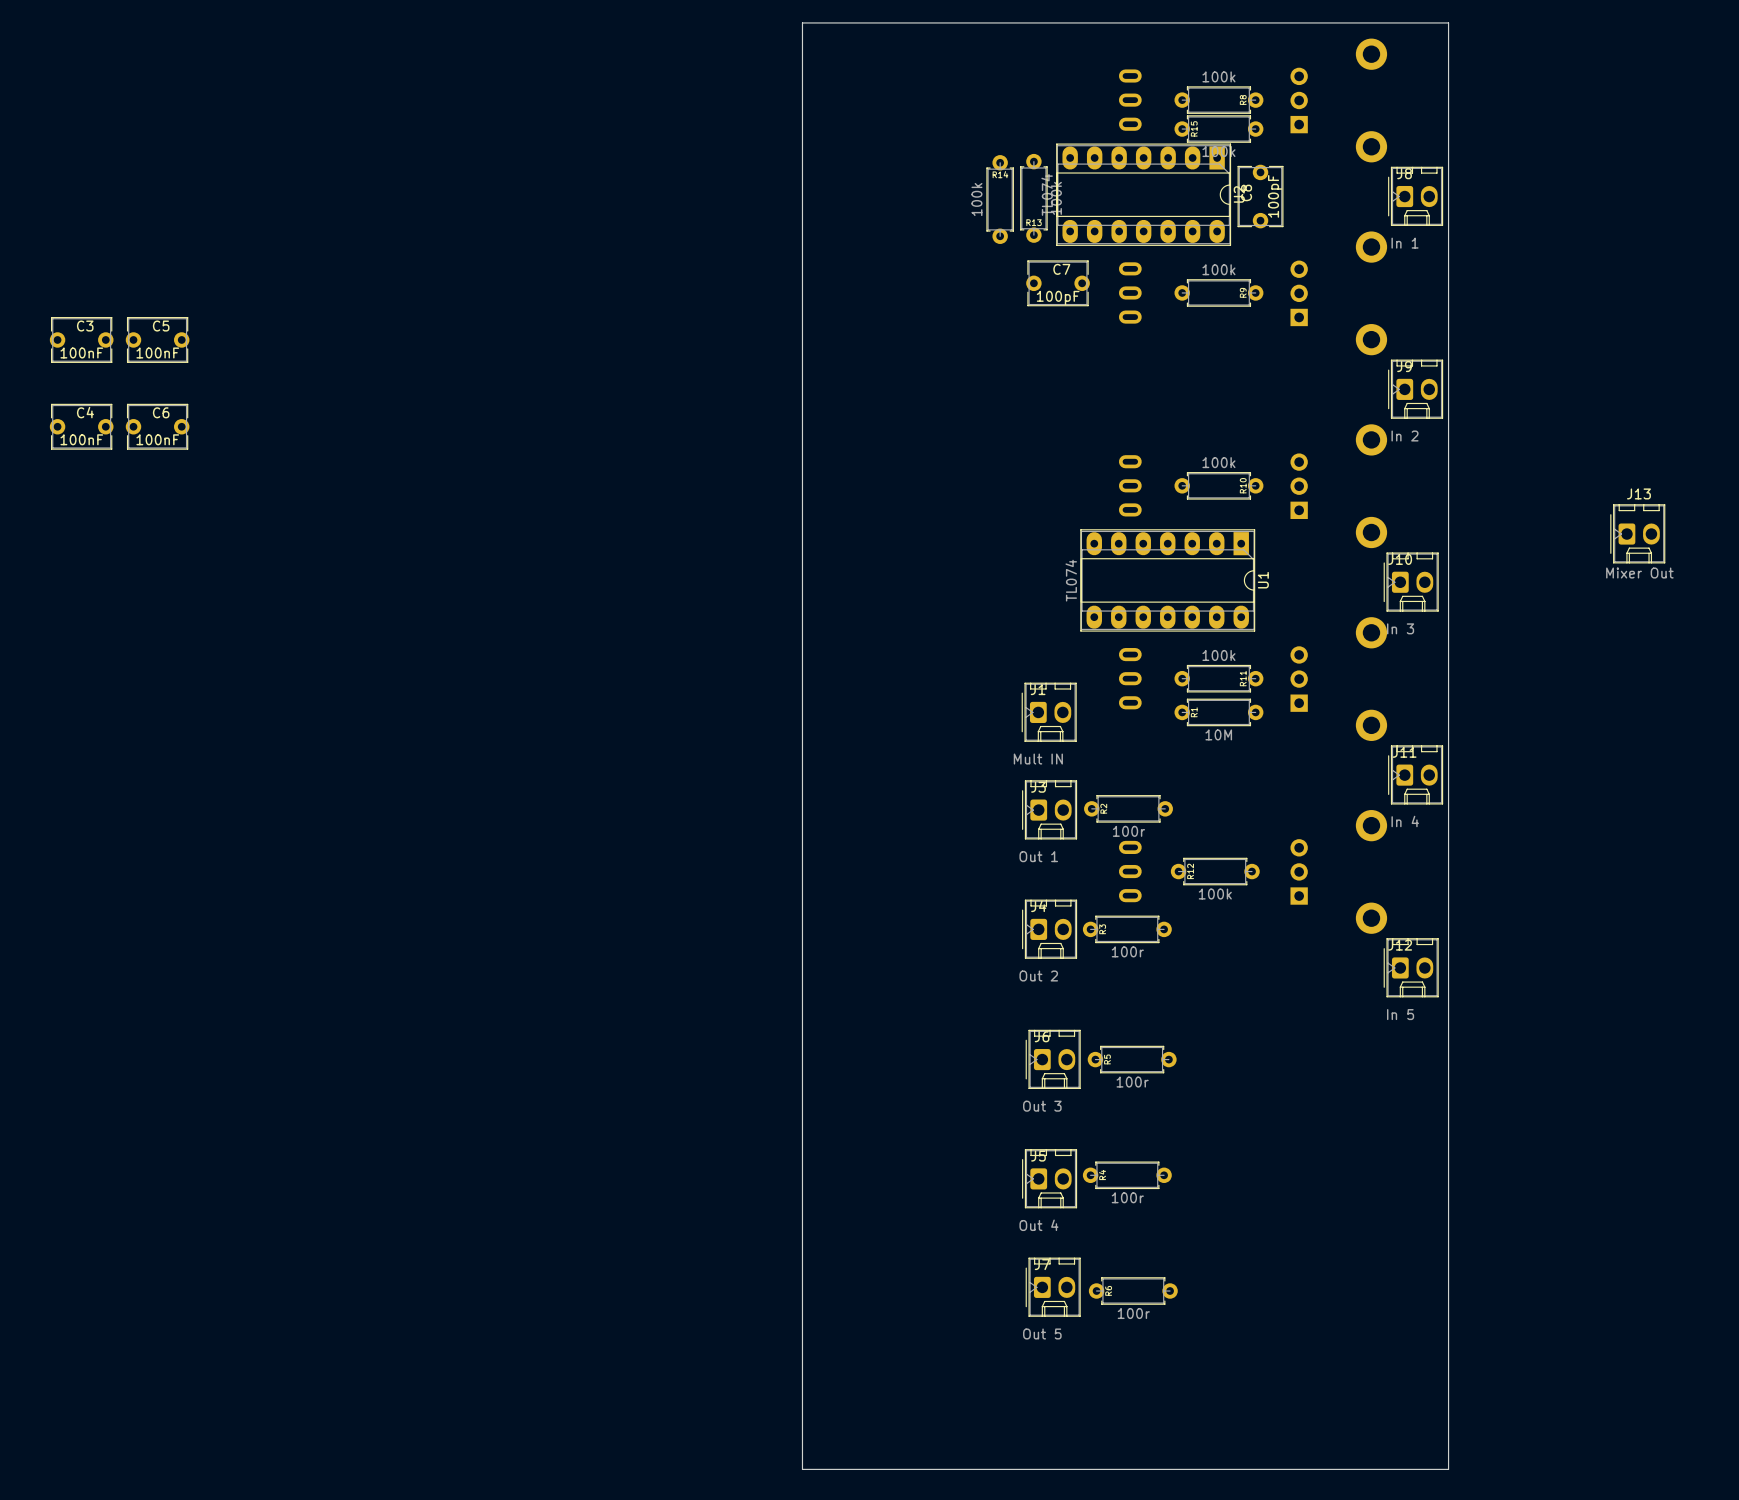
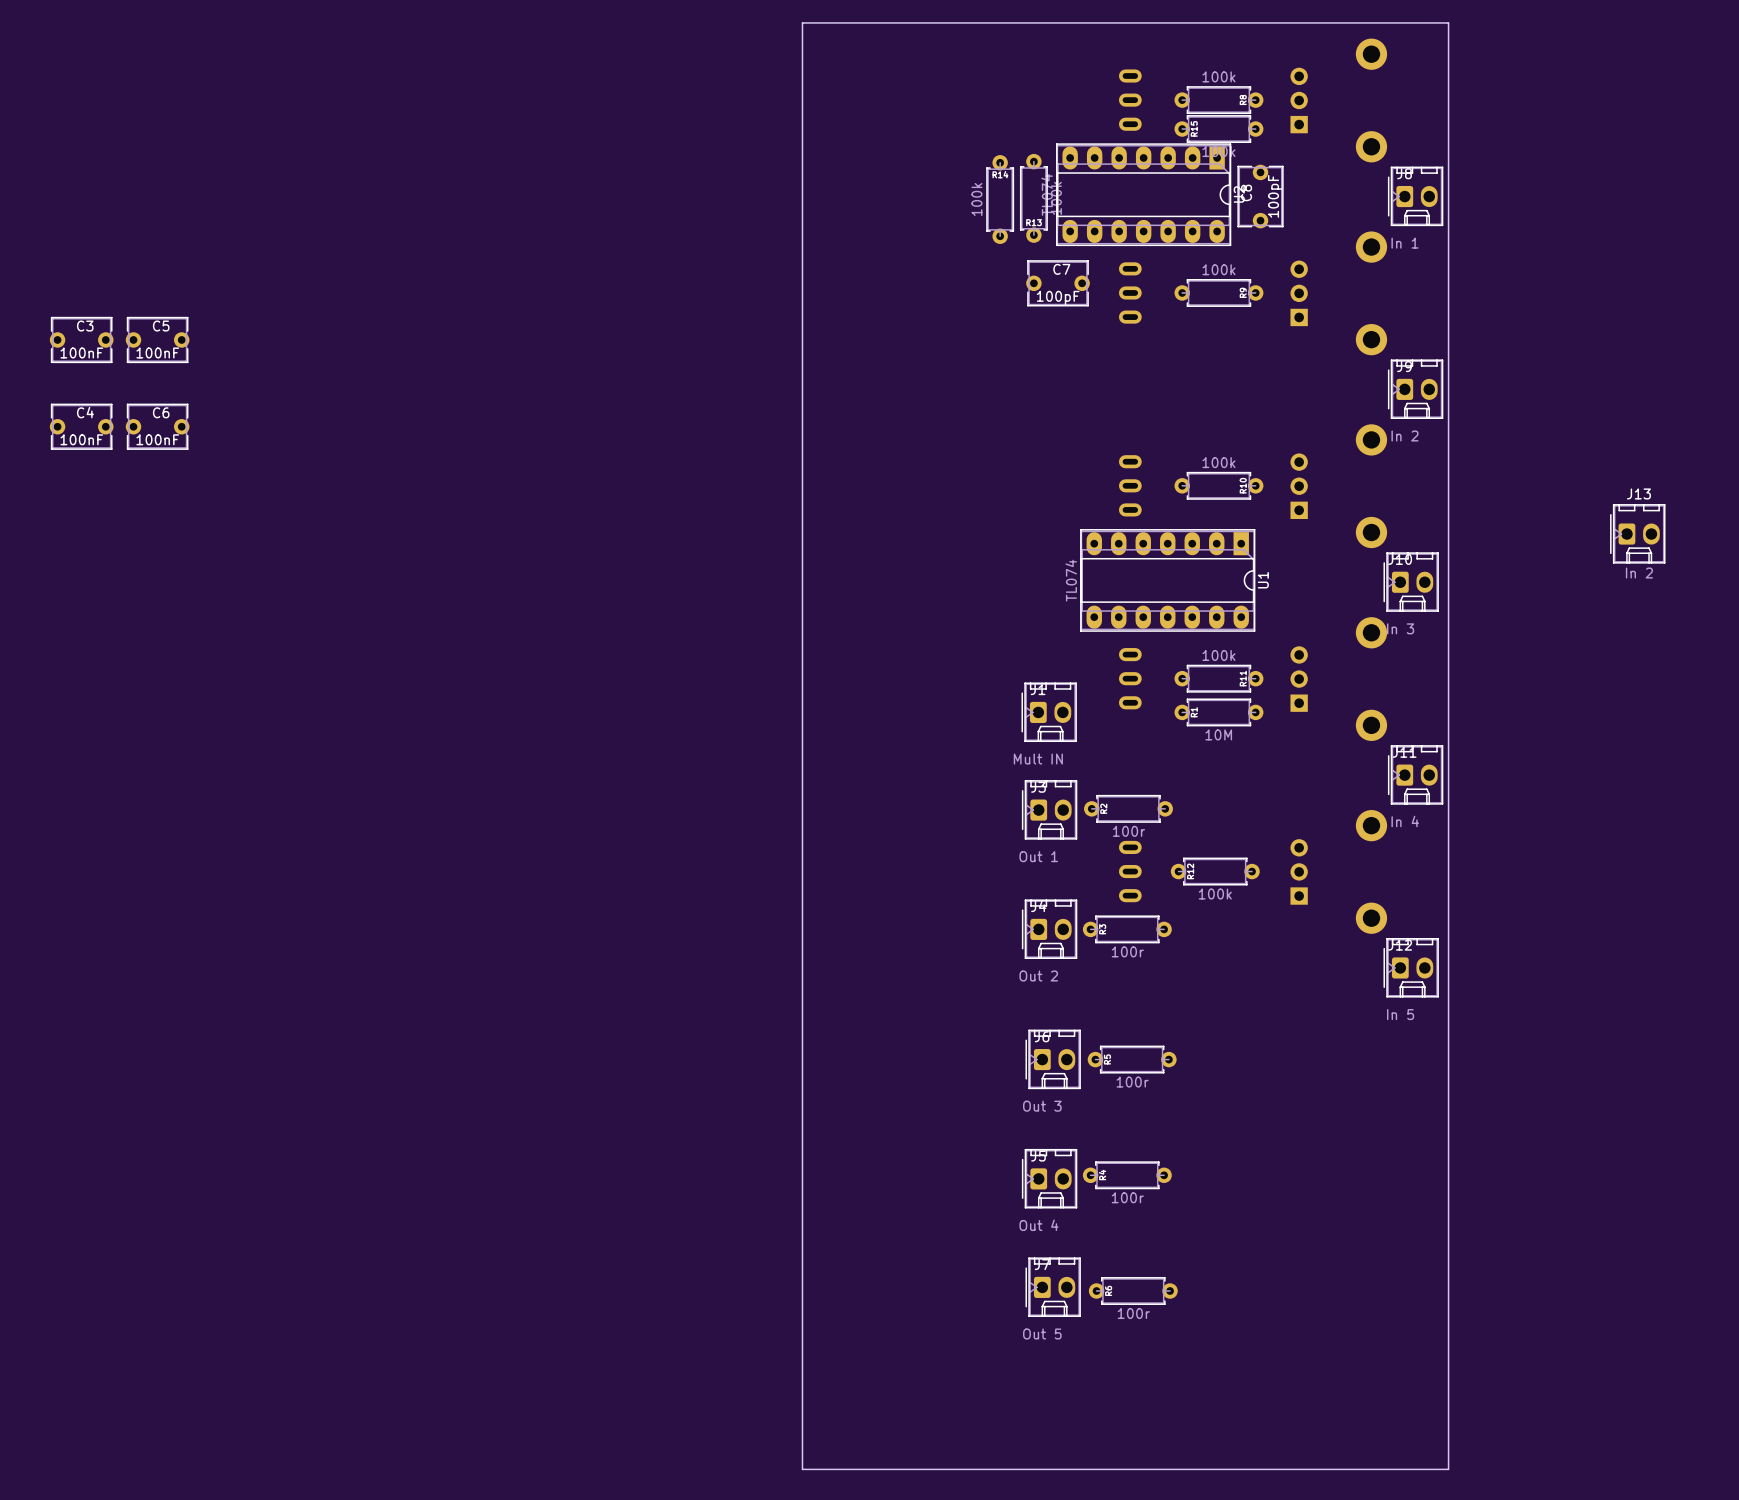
J13 value: Mixer Out (1639, 573) -> In 2 (1639, 573)

